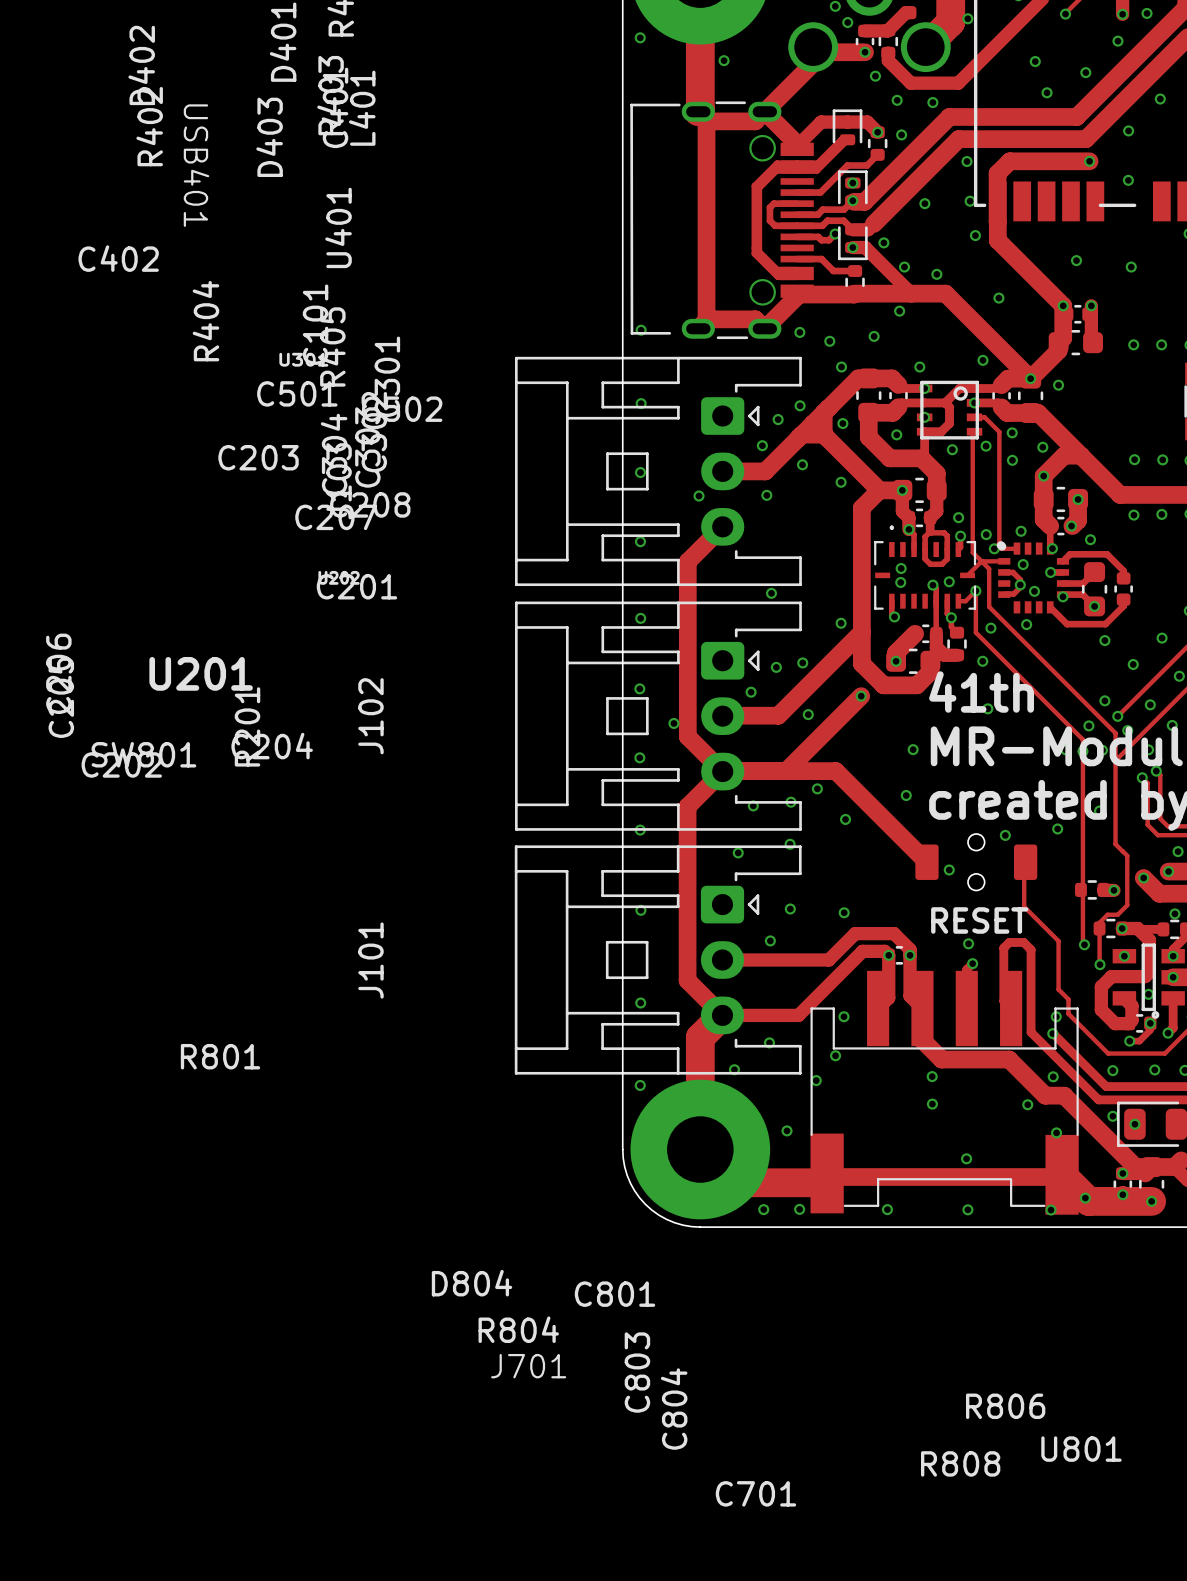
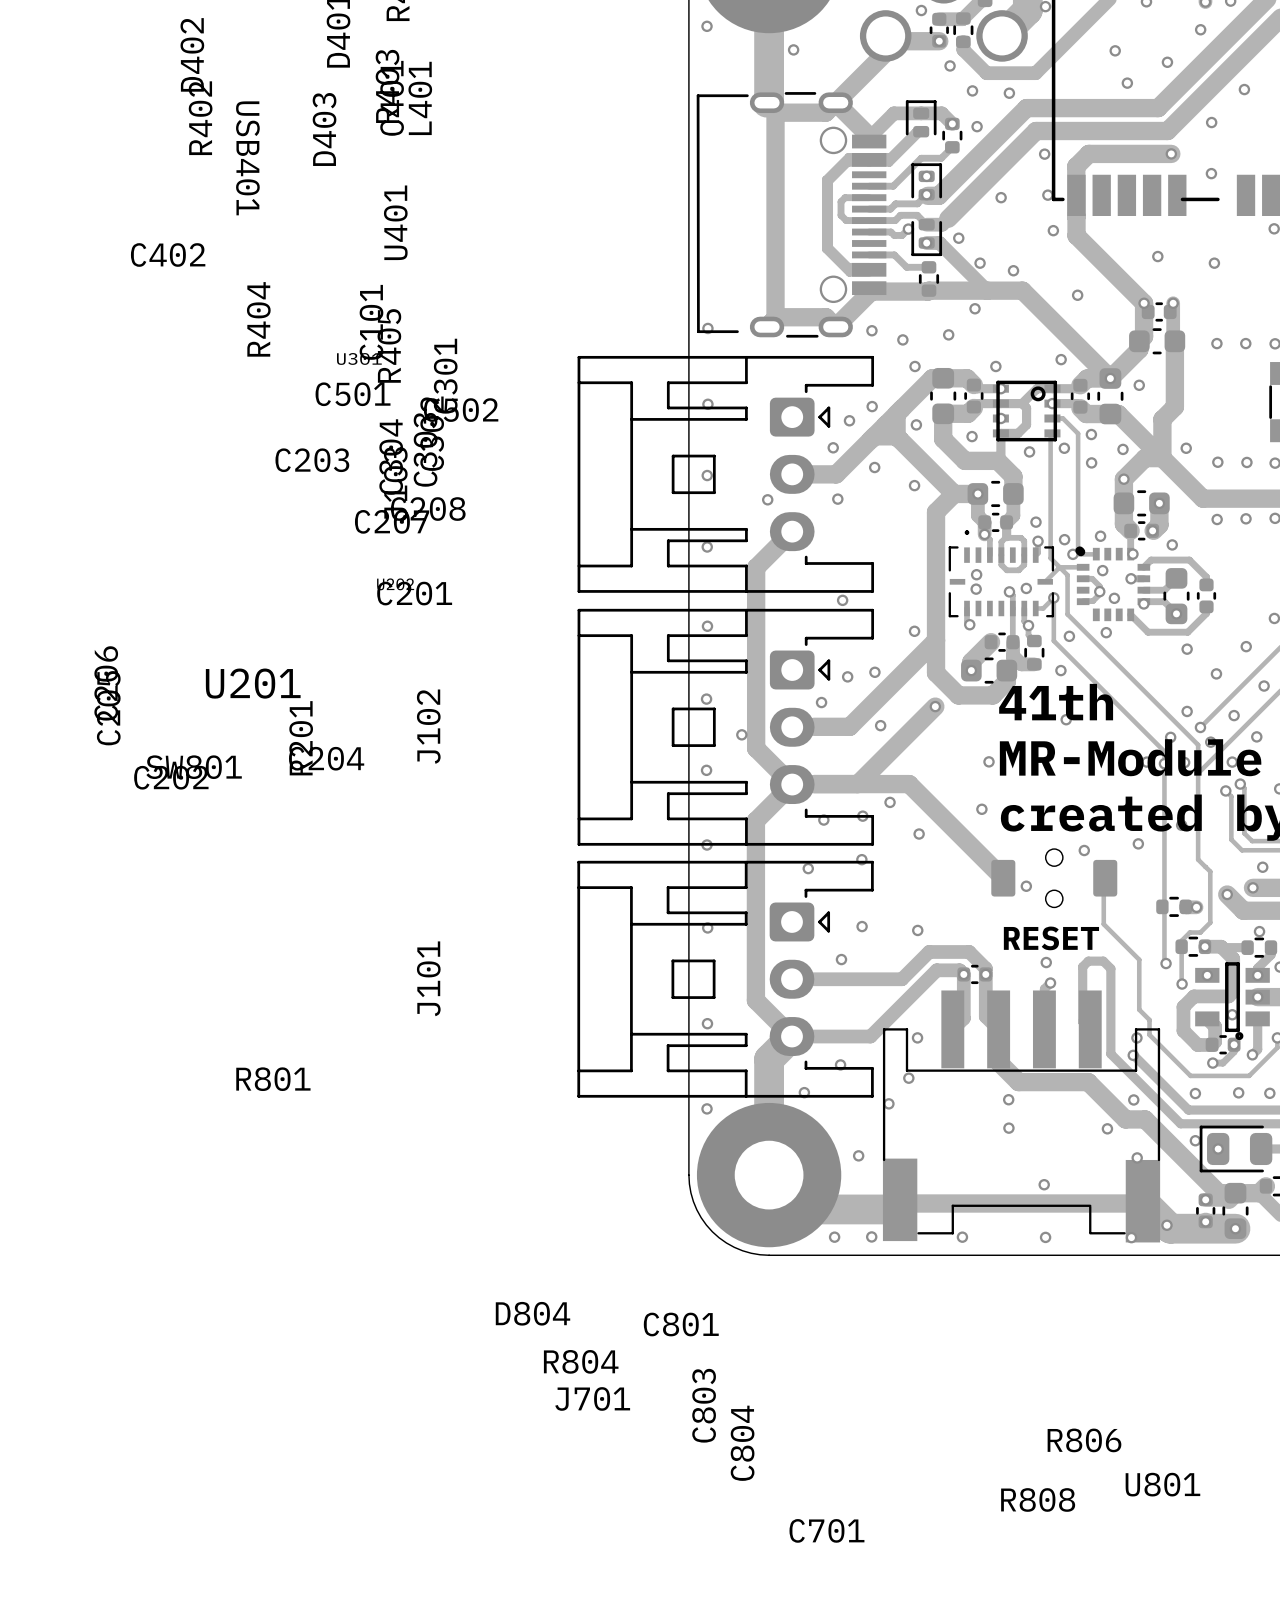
track: none -> (1174, 341) (1174, 406) (1162, 419) (1162, 458)
via: none -> (1186, 448)

